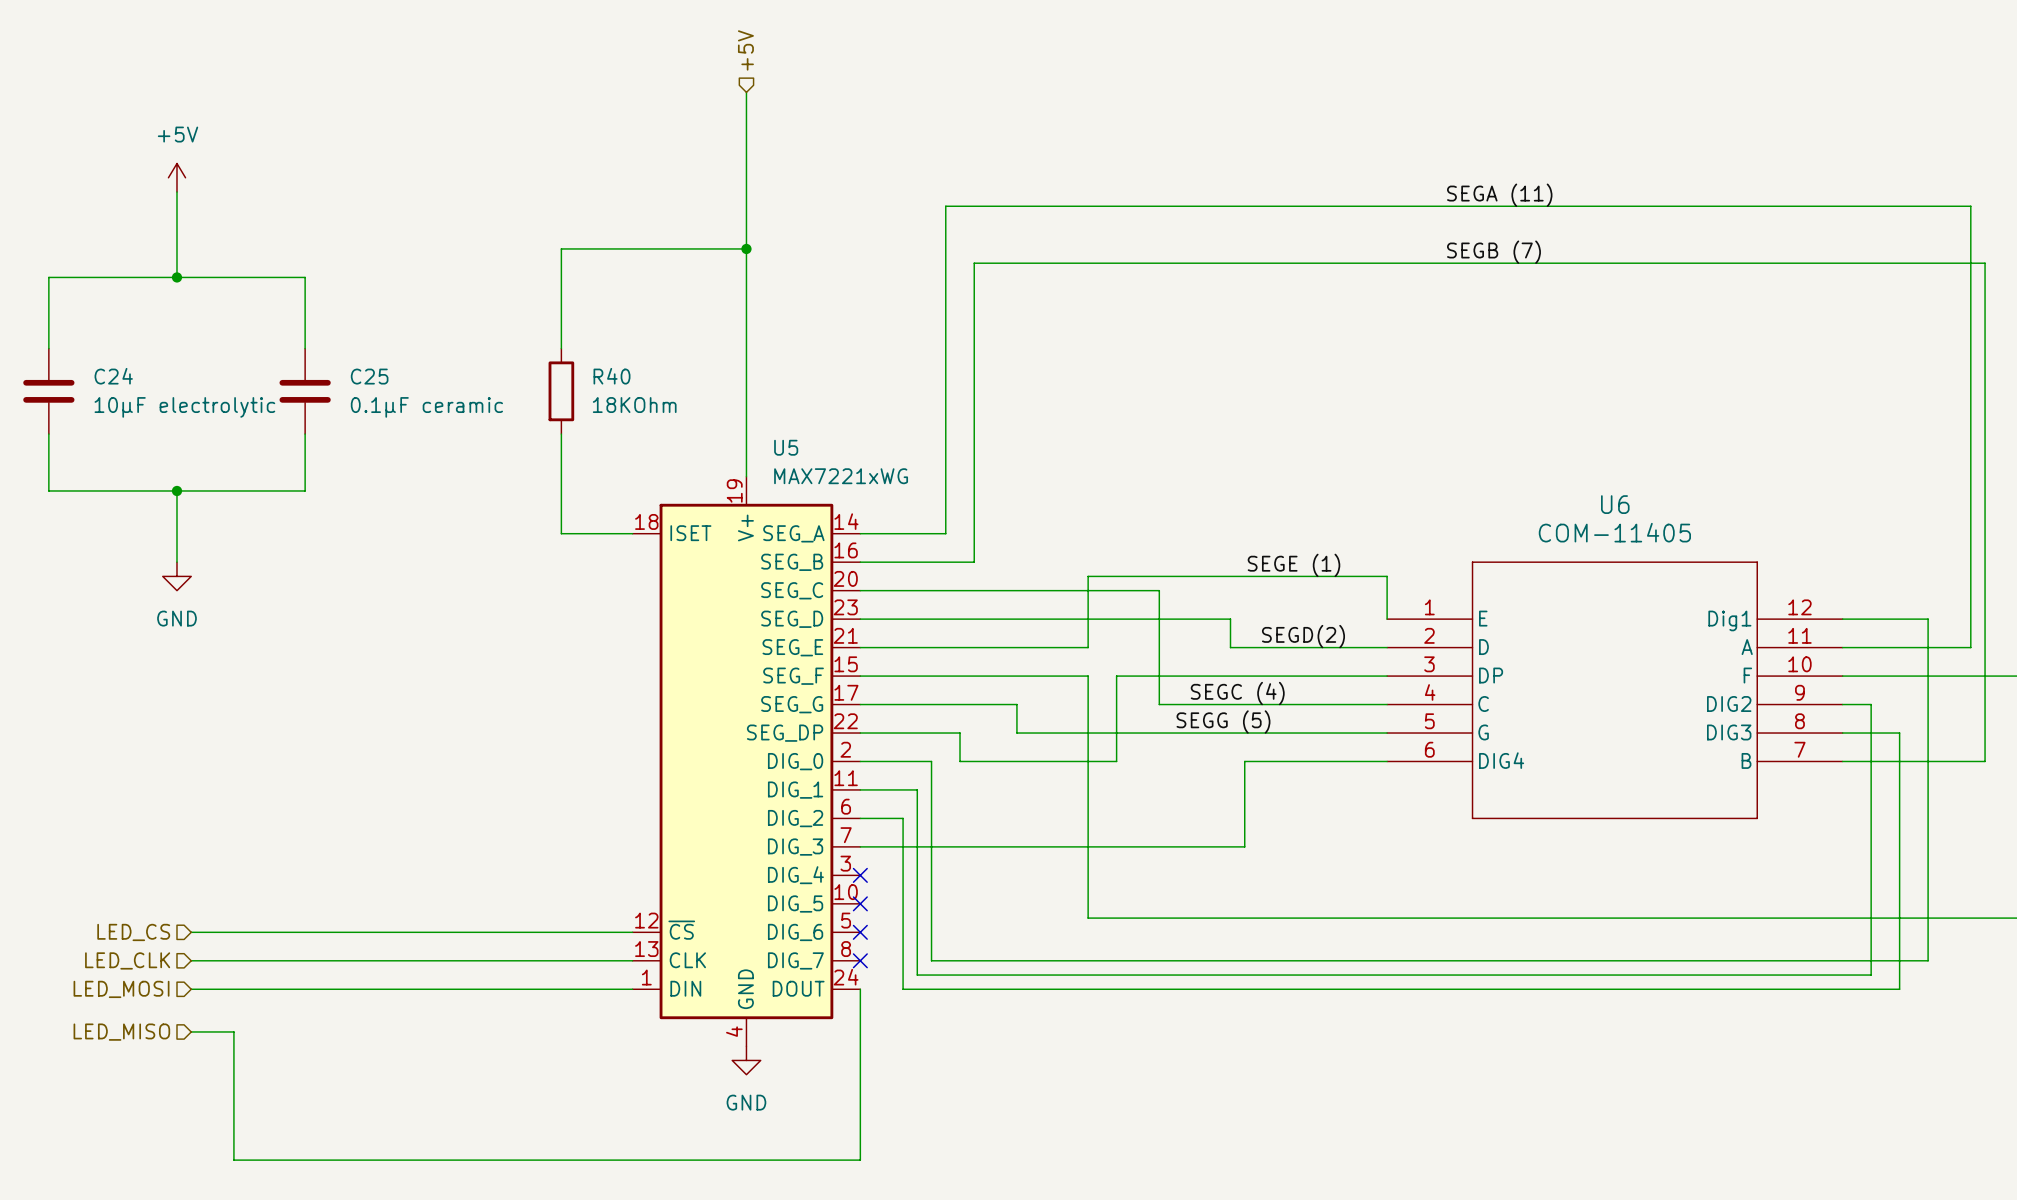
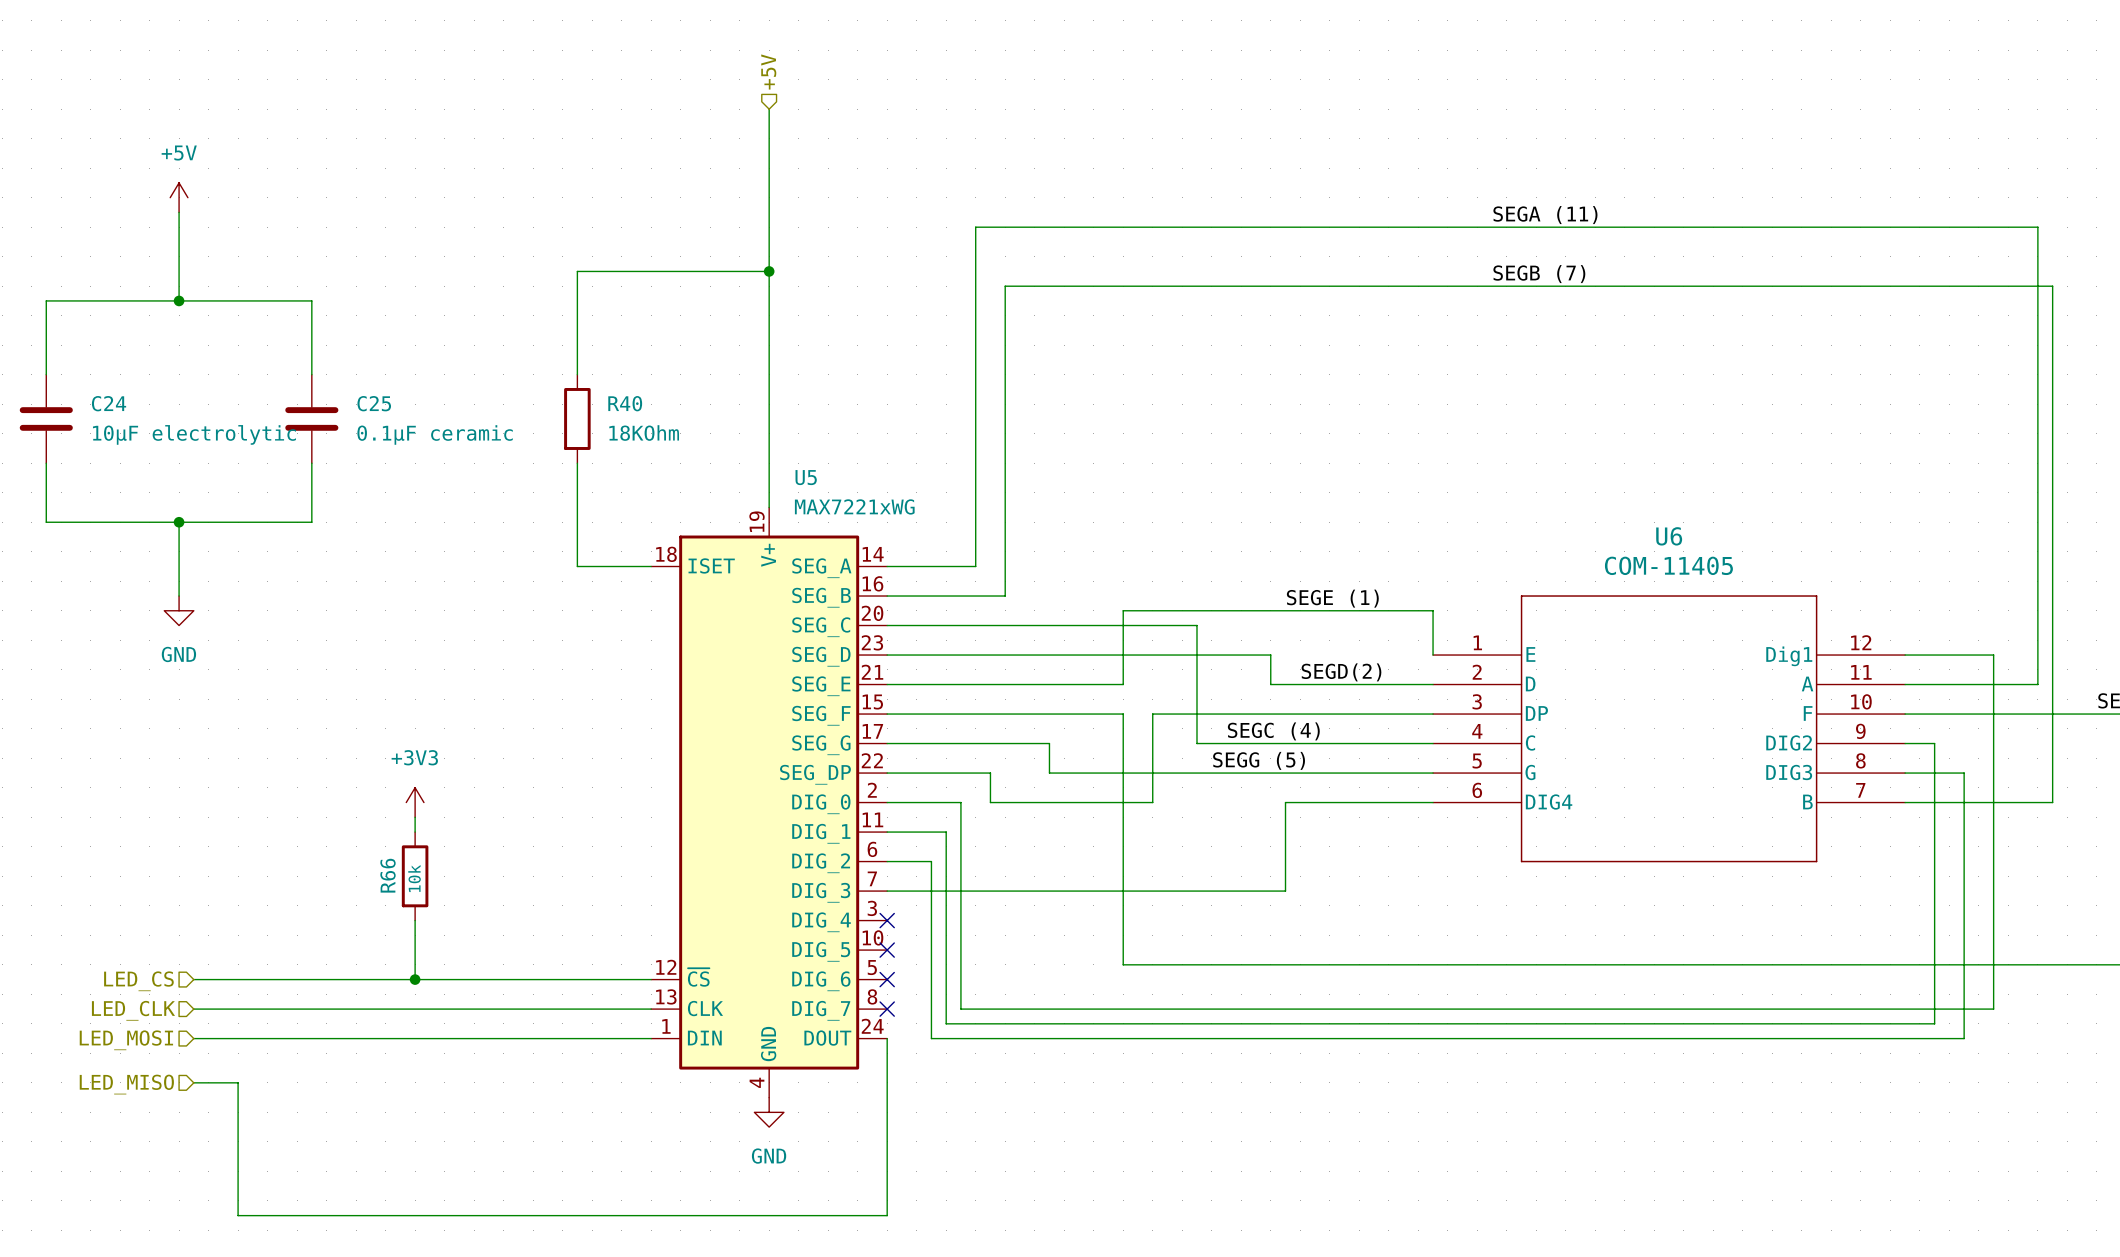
power symbol: none -> +3V3 (415, 802)
wire: none -> (415, 817) (415, 832)
R66: none -> 10k (415, 876)
wire: none -> (415, 920) (415, 979)
junction: none -> (415, 979)

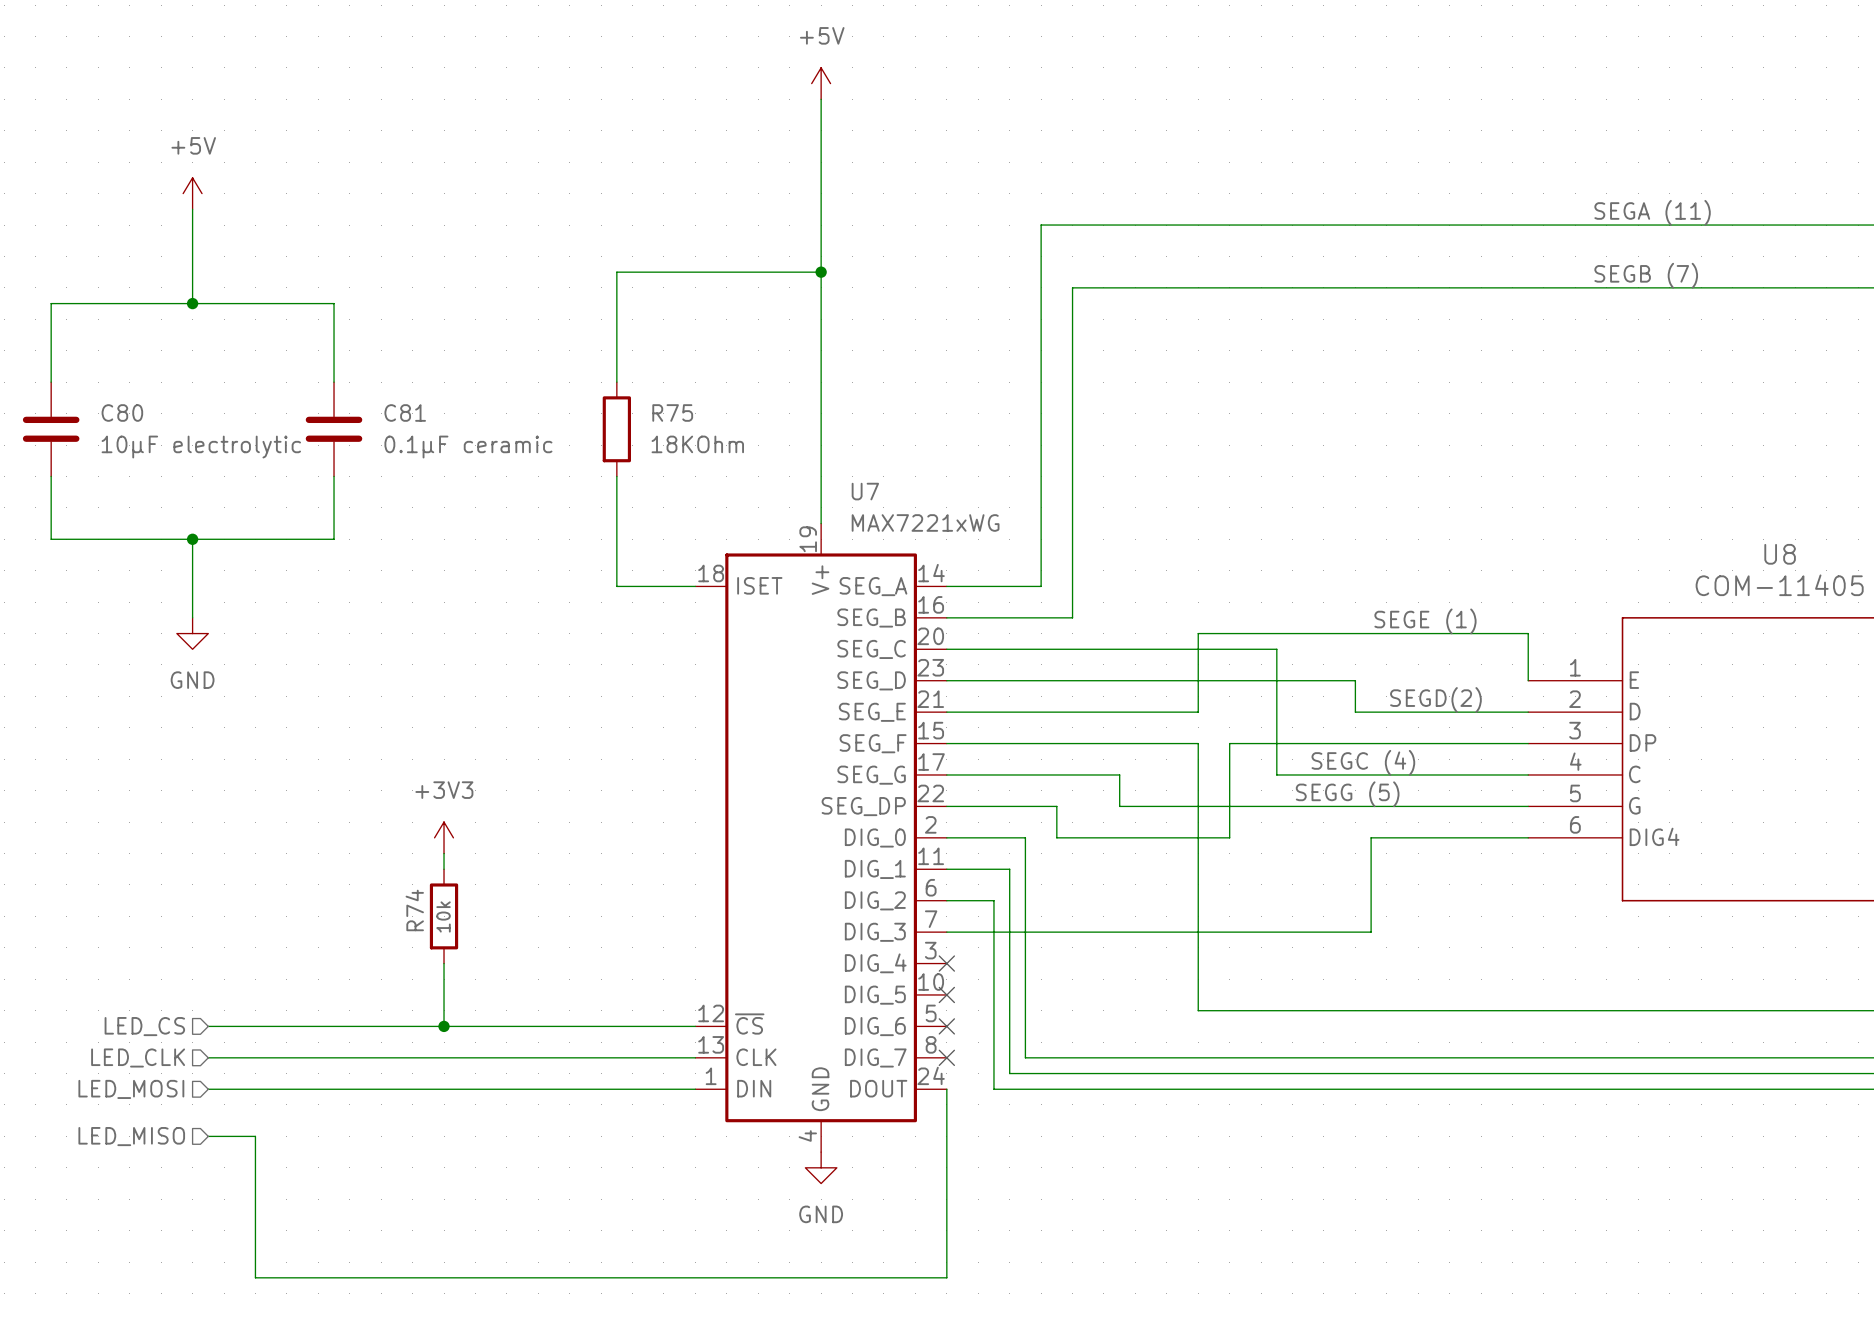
hierarchical label: +5V (768, 72) -> none
power symbol: none -> +5V (821, 83)
C24 name: C24 (109, 403) -> C80 (122, 412)
C25 name: C25 (374, 403) -> C81 (405, 412)
R40 name: R40 (625, 403) -> R75 (672, 412)
U5 name: U5 (806, 477) -> U7 (865, 491)
U6 name: U6 (1669, 536) -> U8 (1780, 554)
R66 name: R66 (388, 875) -> R74 (414, 910)

